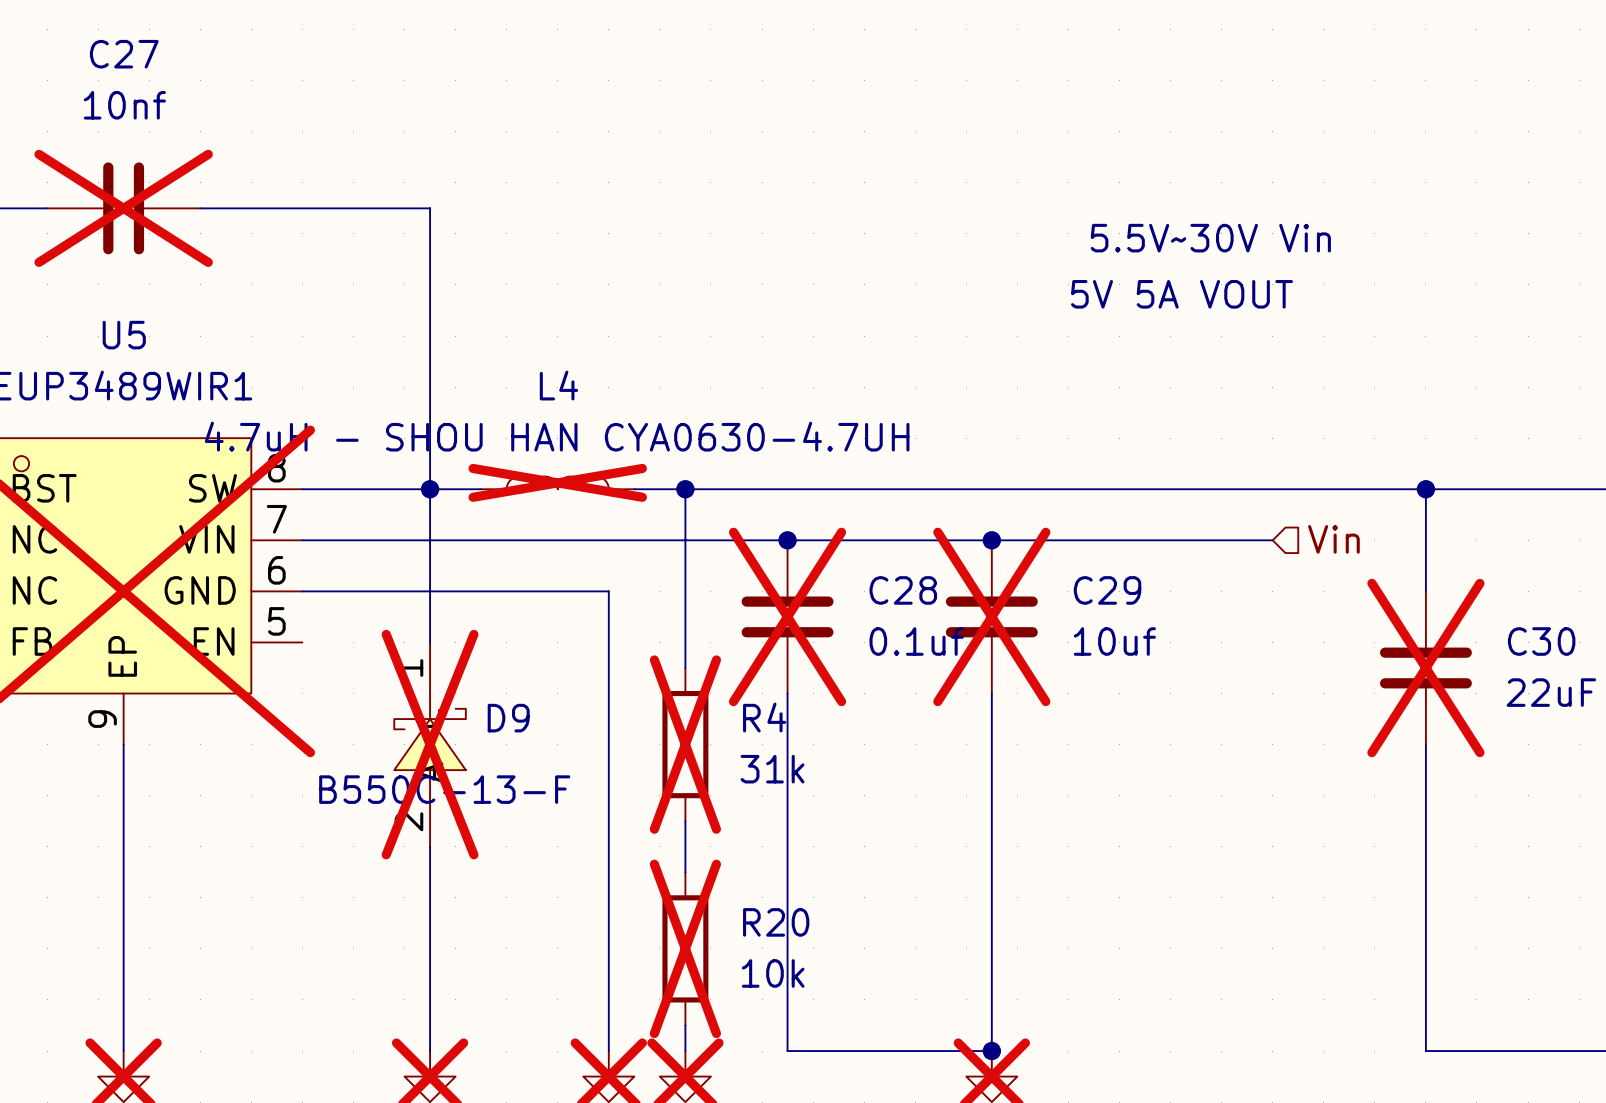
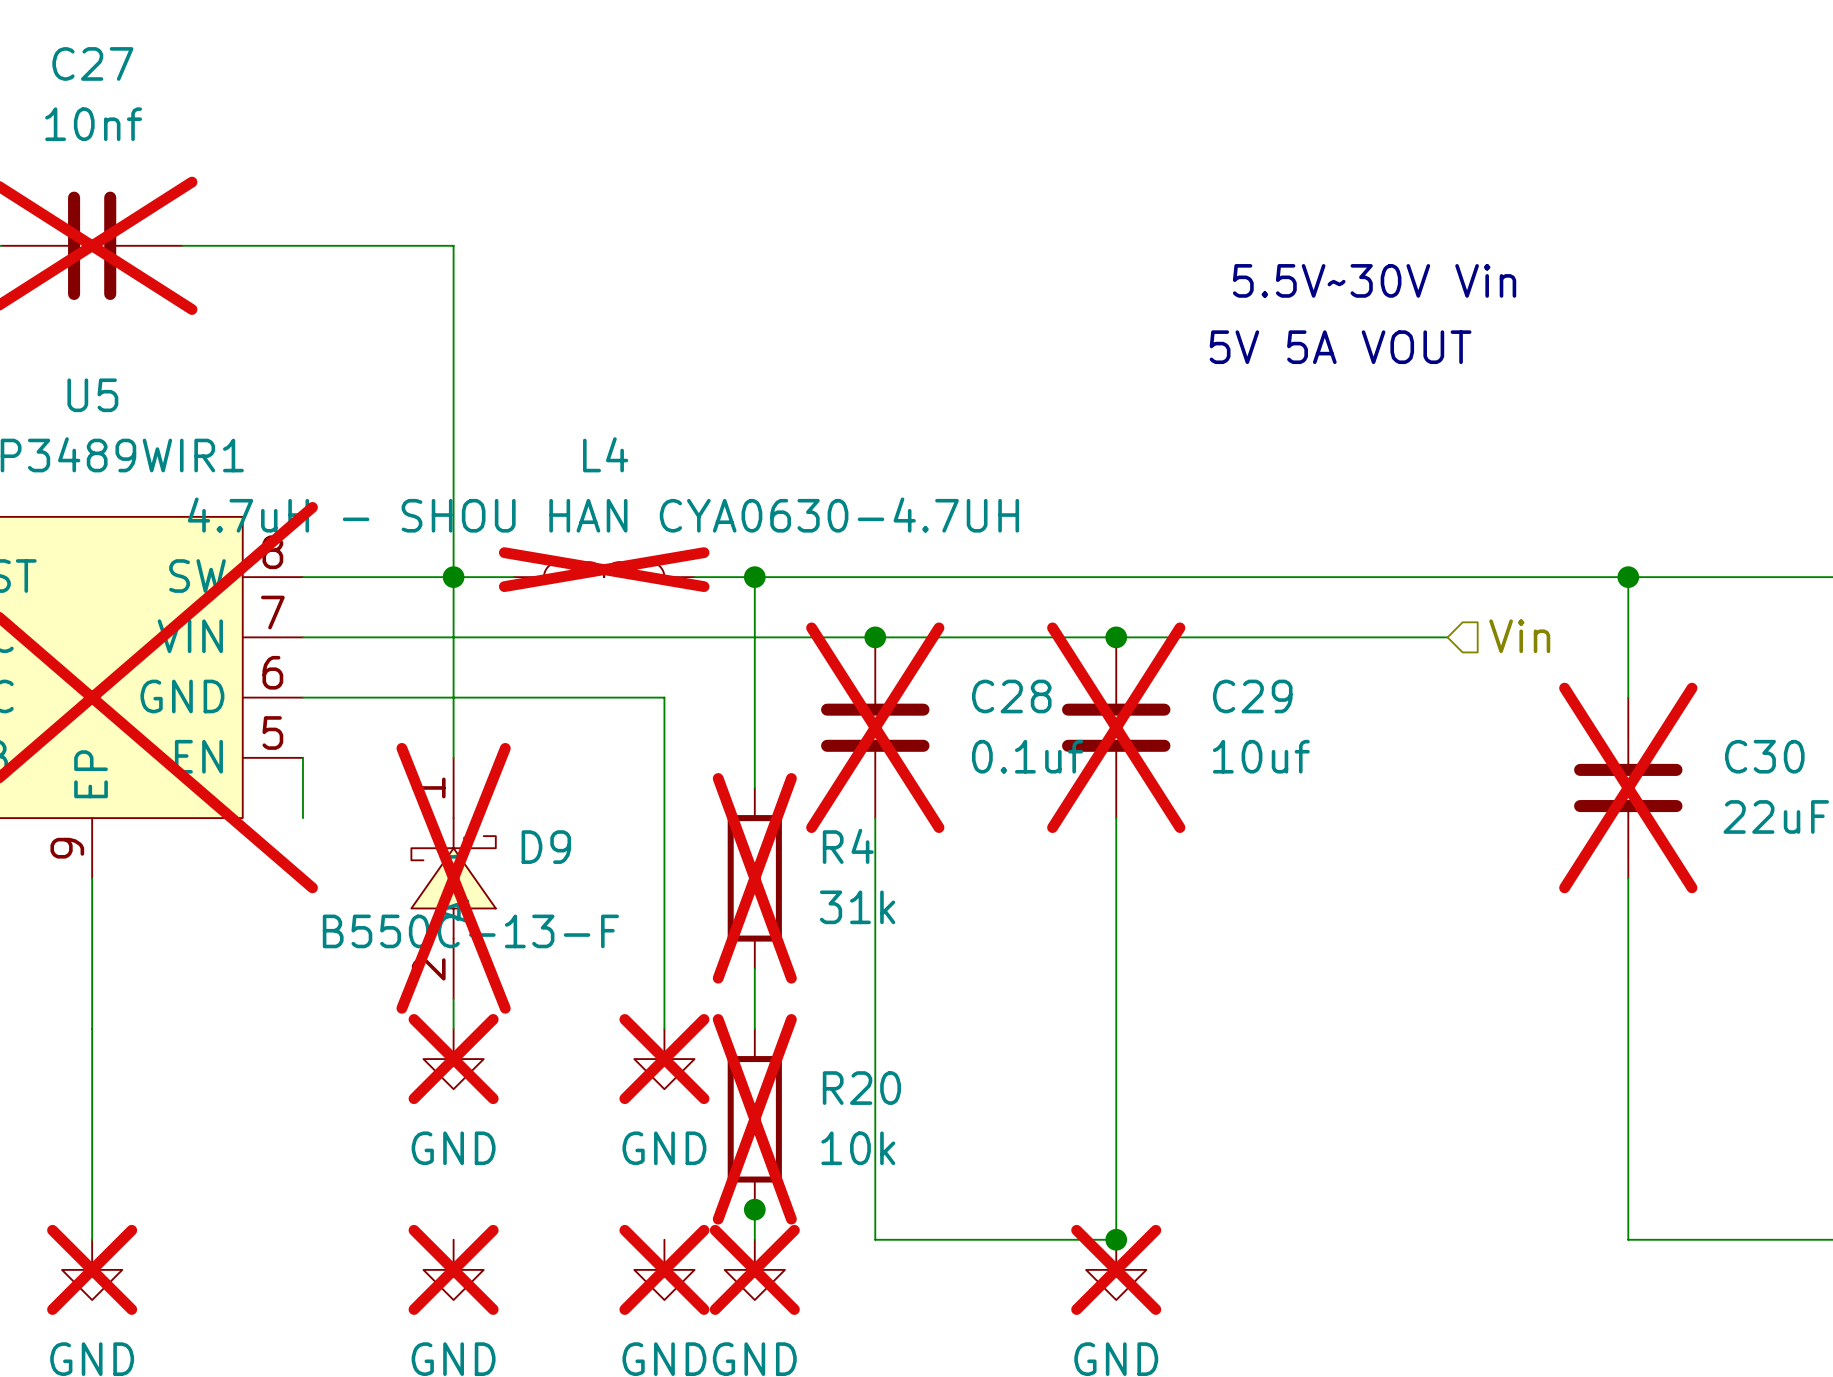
wire: none -> (302, 757) (302, 818)
wire: (430, 872) (430, 1051) -> none
wire: (608, 872) (608, 1051) -> none
power symbol: none -> GND (453, 1059)
power symbol: none -> GND (664, 1059)
junction: none -> (754, 1209)

